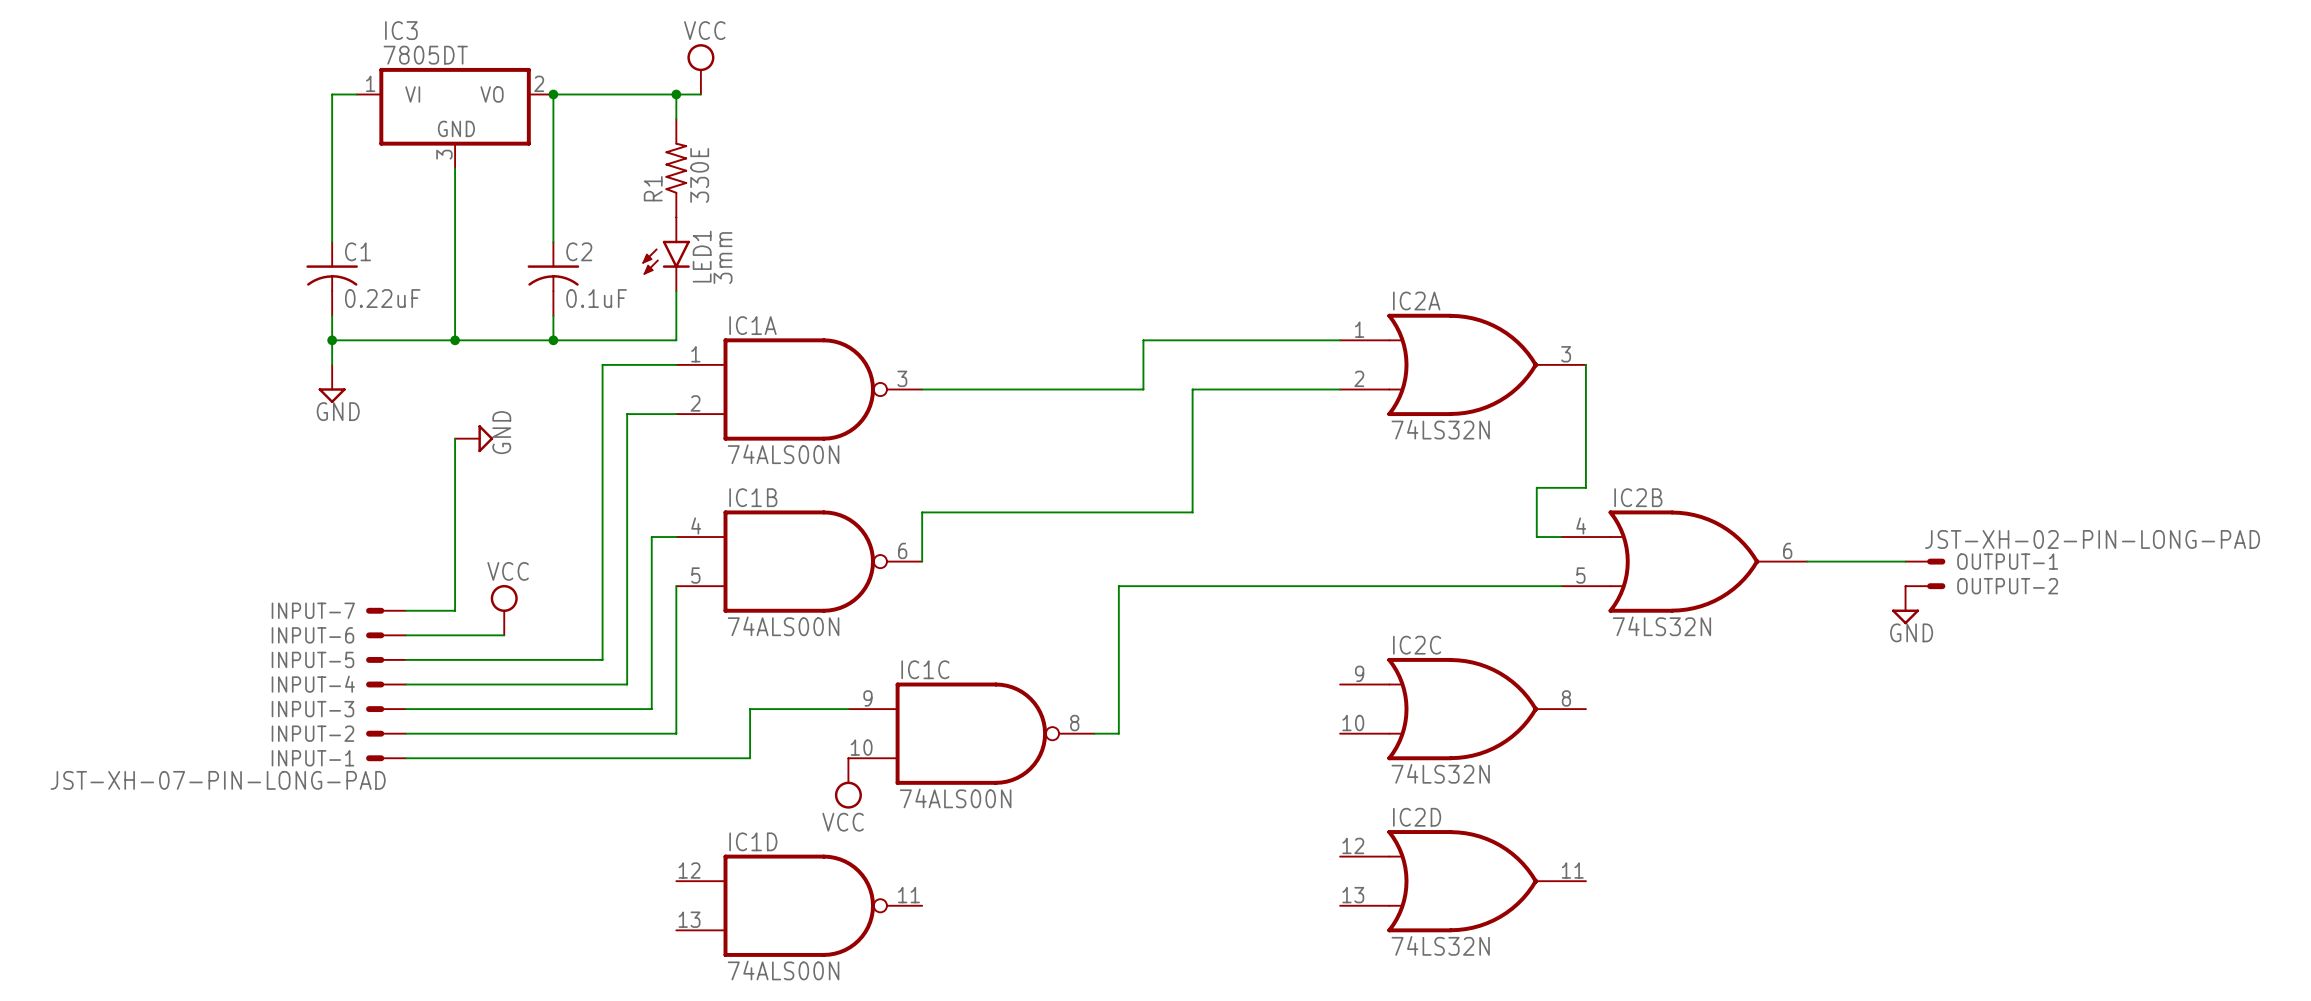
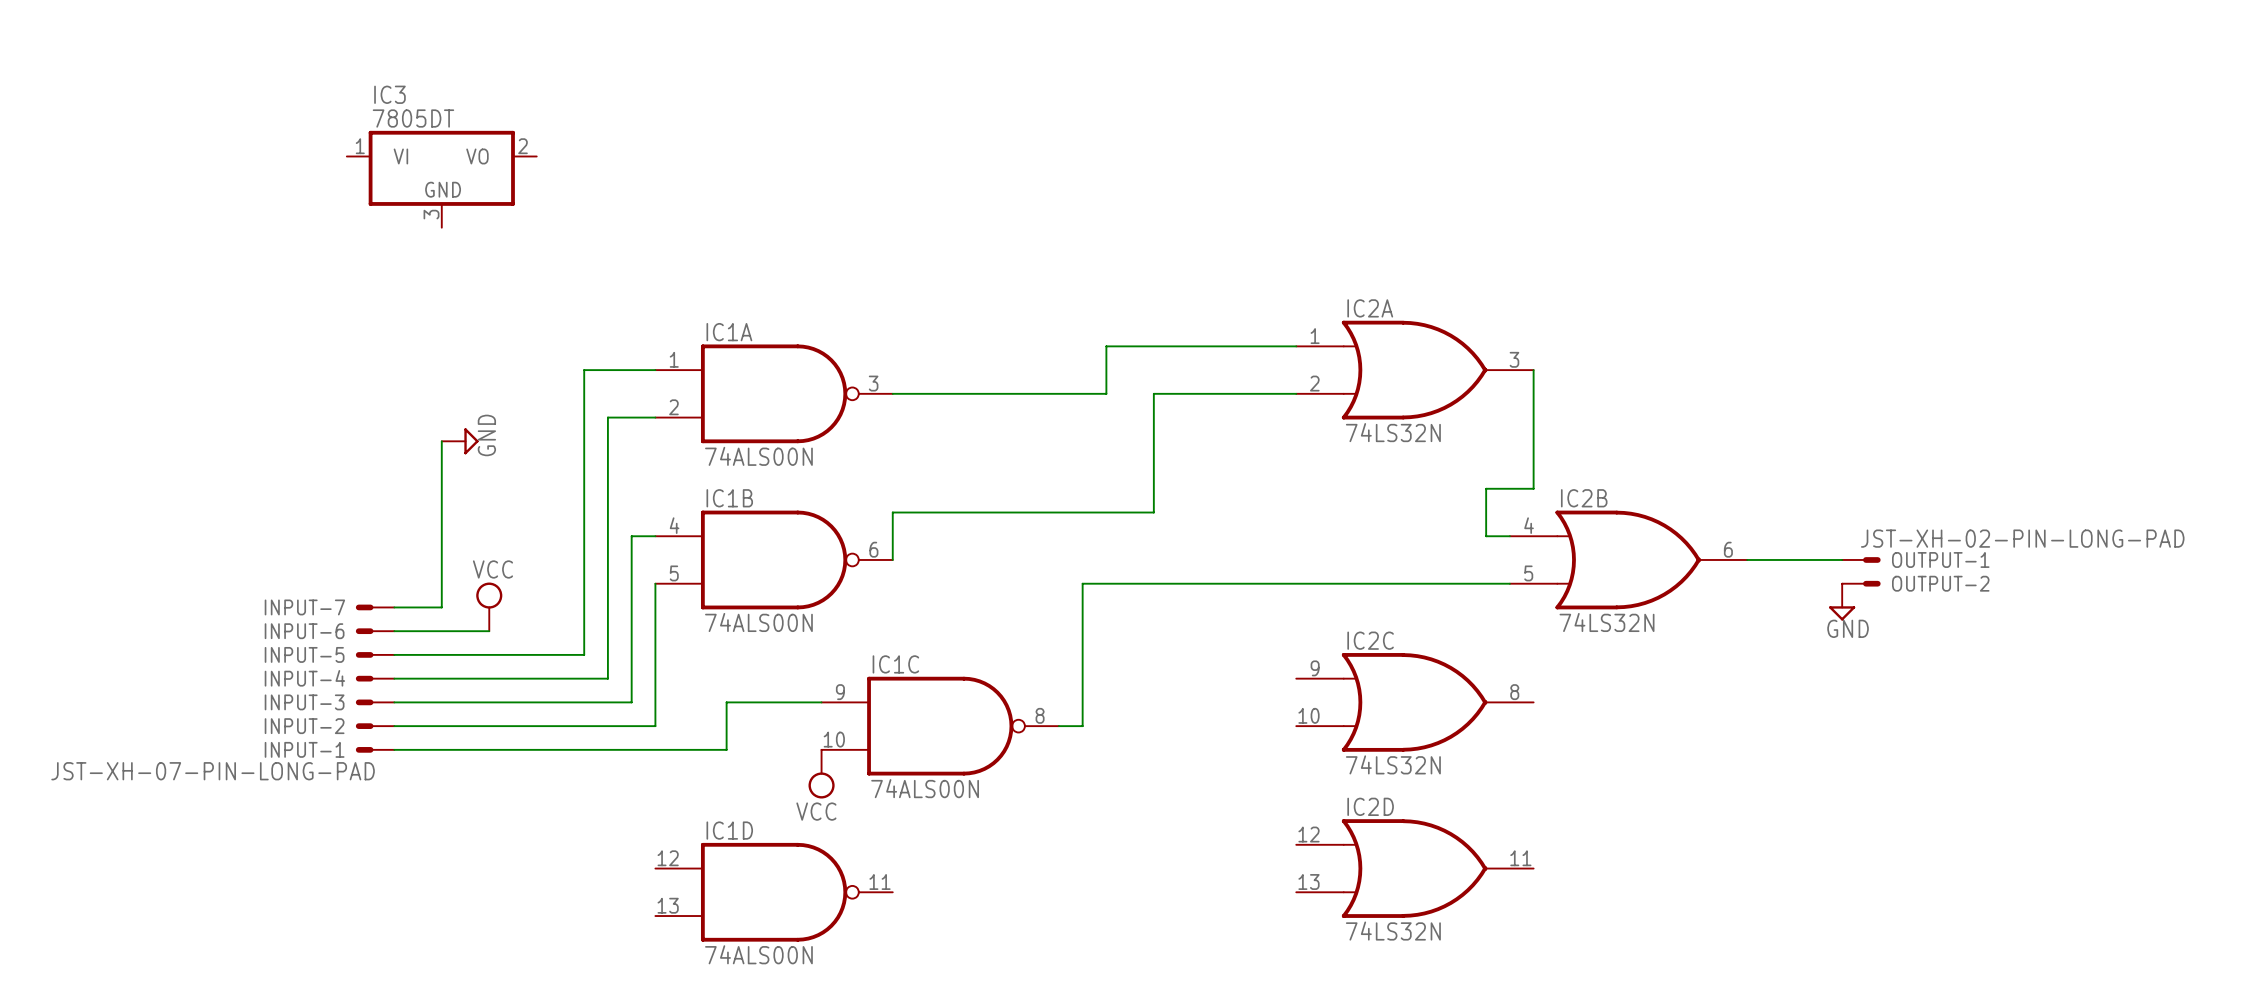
power symbol: VCC (700, 69) -> none
wire: (356, 94) (332, 94) (332, 241) -> none
junction: (553, 94) -> none
wire: (676, 94) (676, 119) -> none
junction: (676, 94) -> none
wire: (700, 94) (553, 94) (553, 241) -> none
IC3 position: (455, 118) -> (441, 179)
wire: (455, 168) (455, 340) -> none
R1: 330E (676, 168) -> none
LED1: 3mm (666, 254) -> none
C1: 0.22uF (332, 278) -> none
C2: 0.1uF (553, 278) -> none
wire: (676, 291) (676, 340) (332, 340) -> none
wire: (332, 315) (332, 364) -> none
wire: (553, 315) (553, 340) -> none
junction: (332, 340) -> none
junction: (455, 340) -> none
junction: (553, 340) -> none
power symbol: GND (332, 383) -> none

